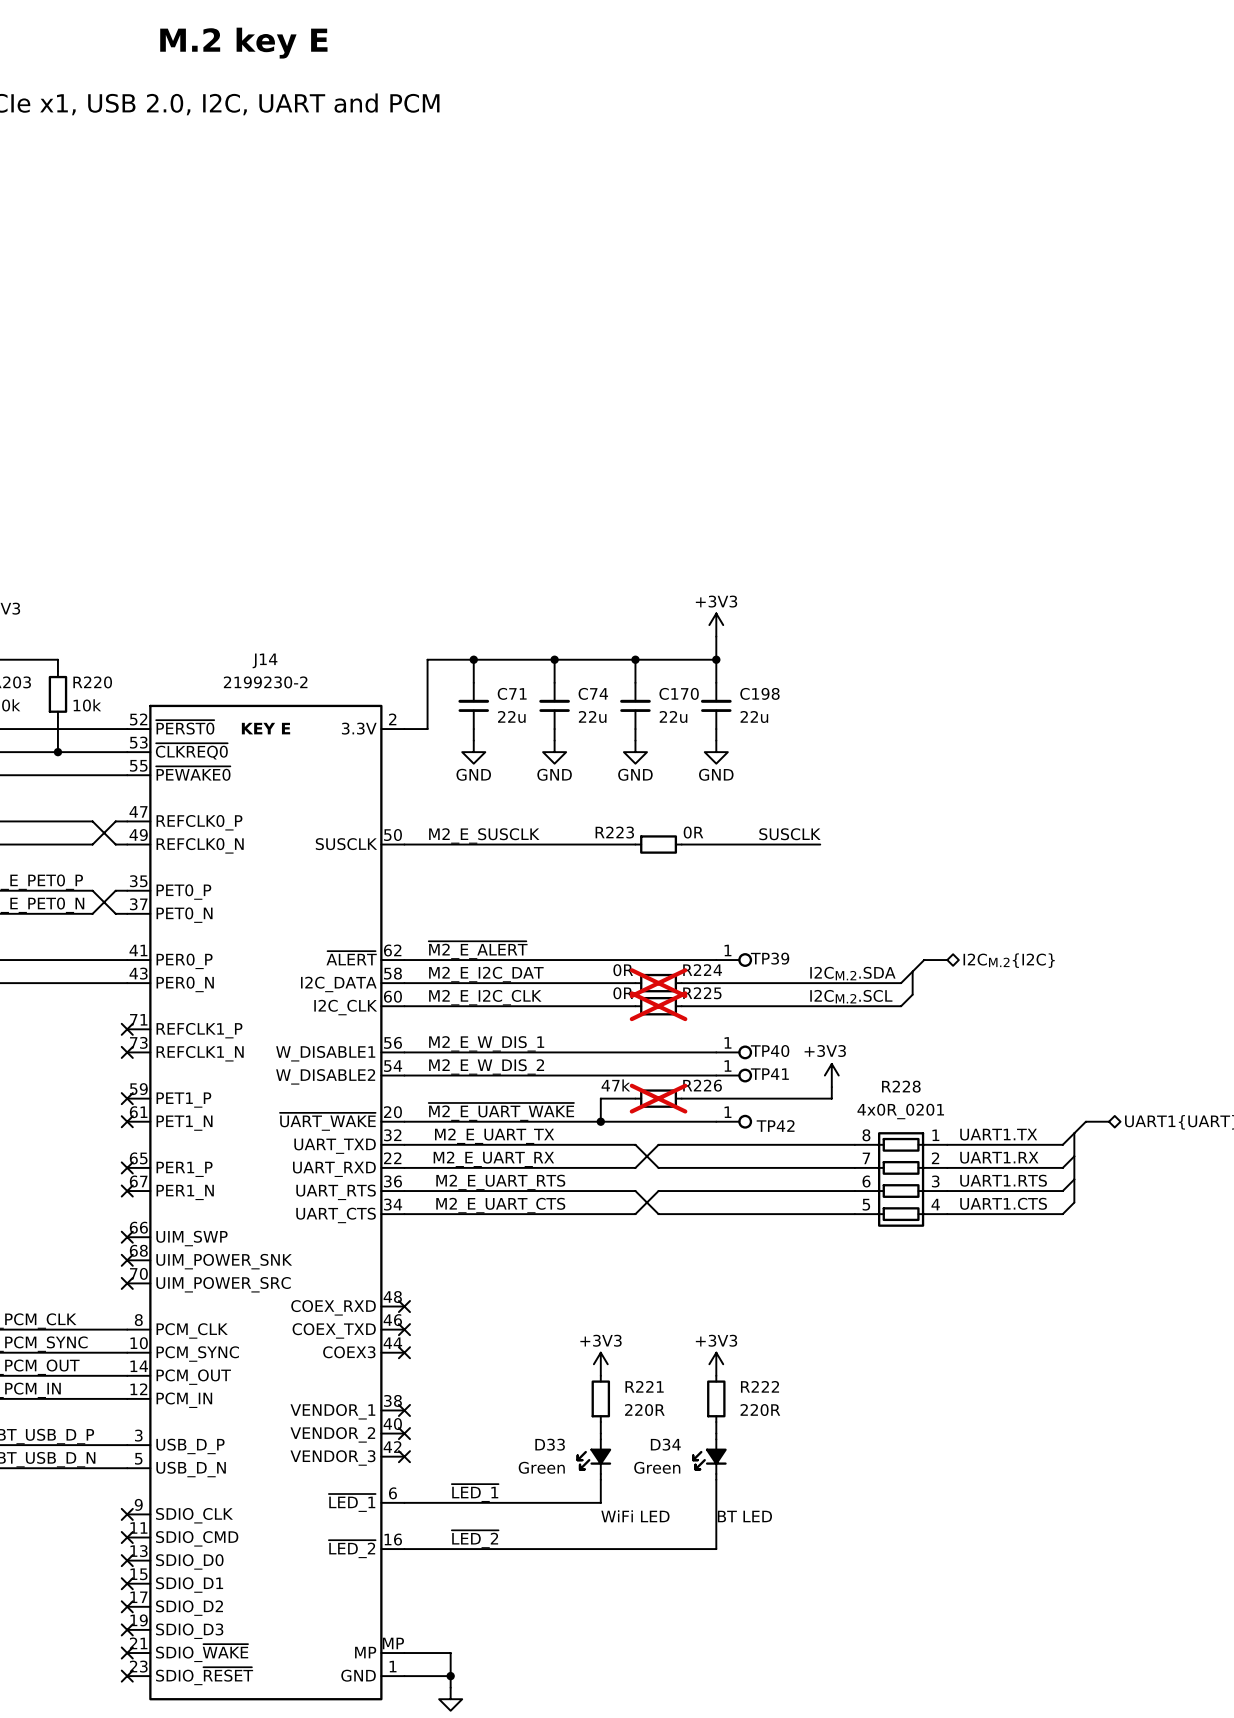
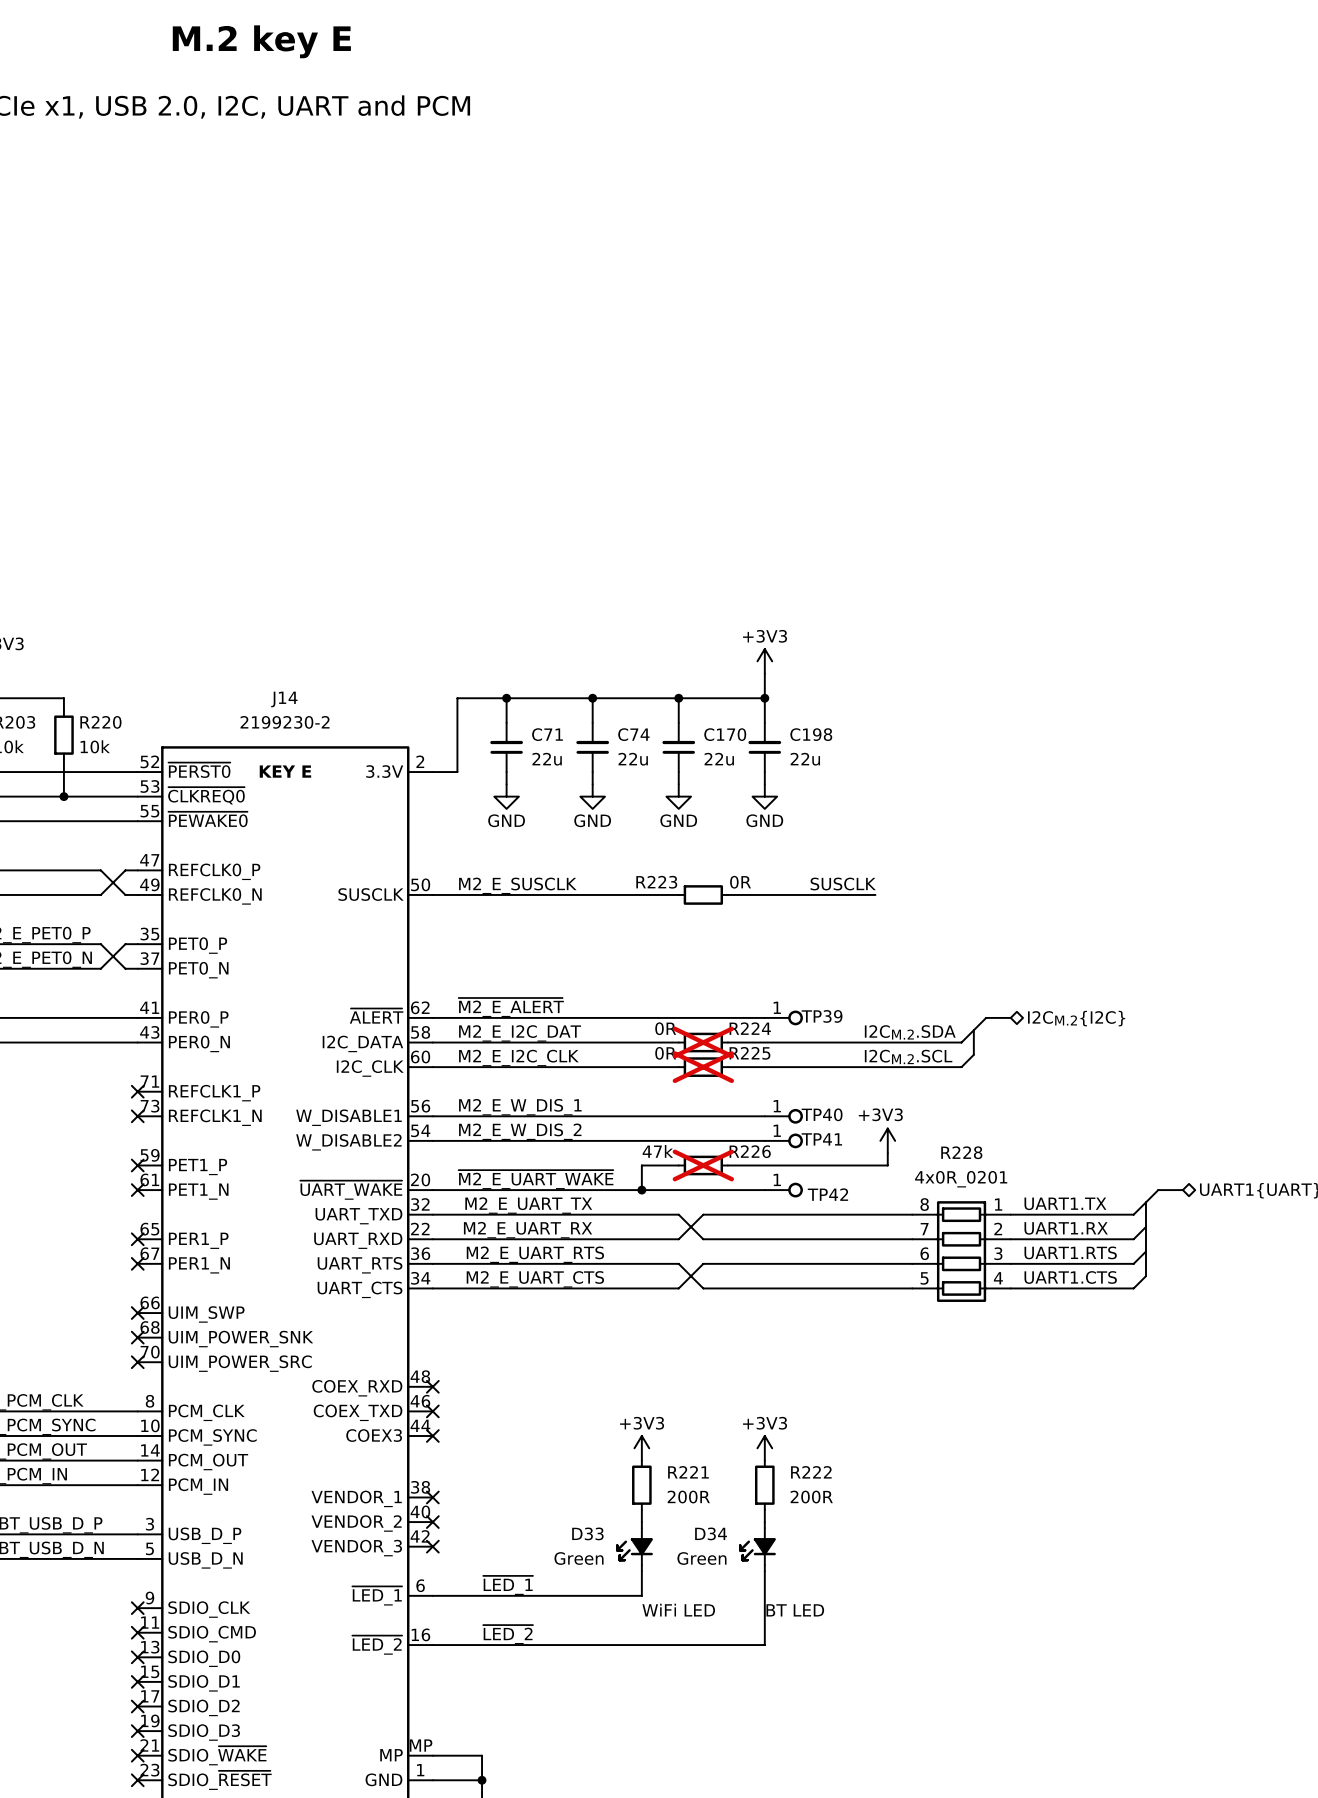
R221 text: 220R (644, 1410) -> 200R (688, 1497)
R222 text: 220R (760, 1410) -> 200R (811, 1497)

